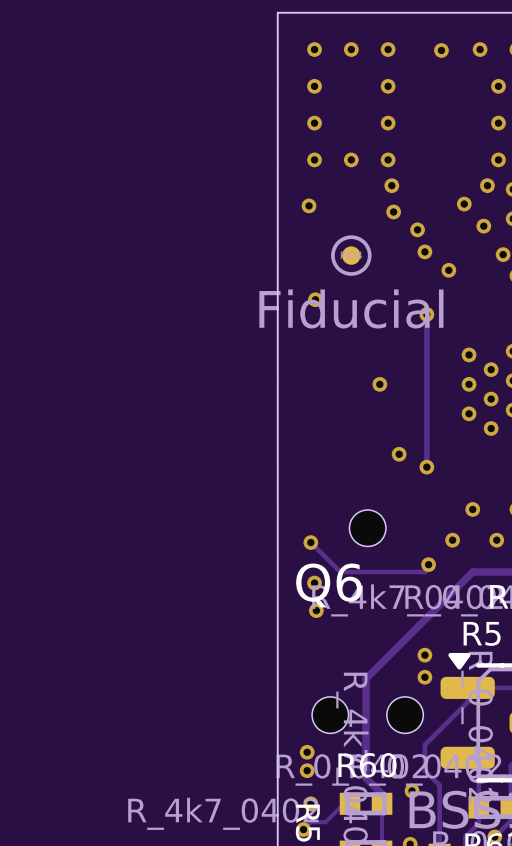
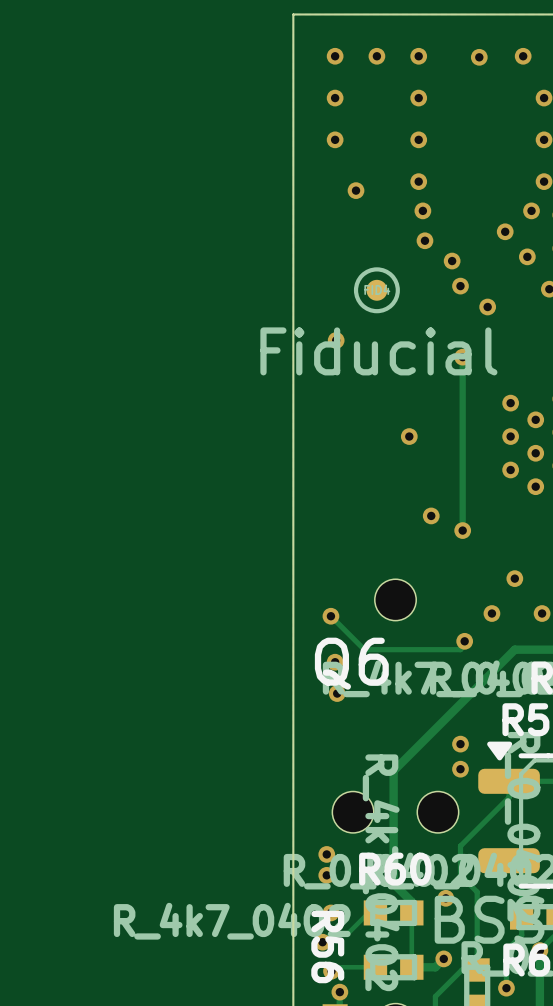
via: (314, 159) -> none
via: (351, 159) -> none
via: none -> (356, 190)
via: (309, 205) -> none

